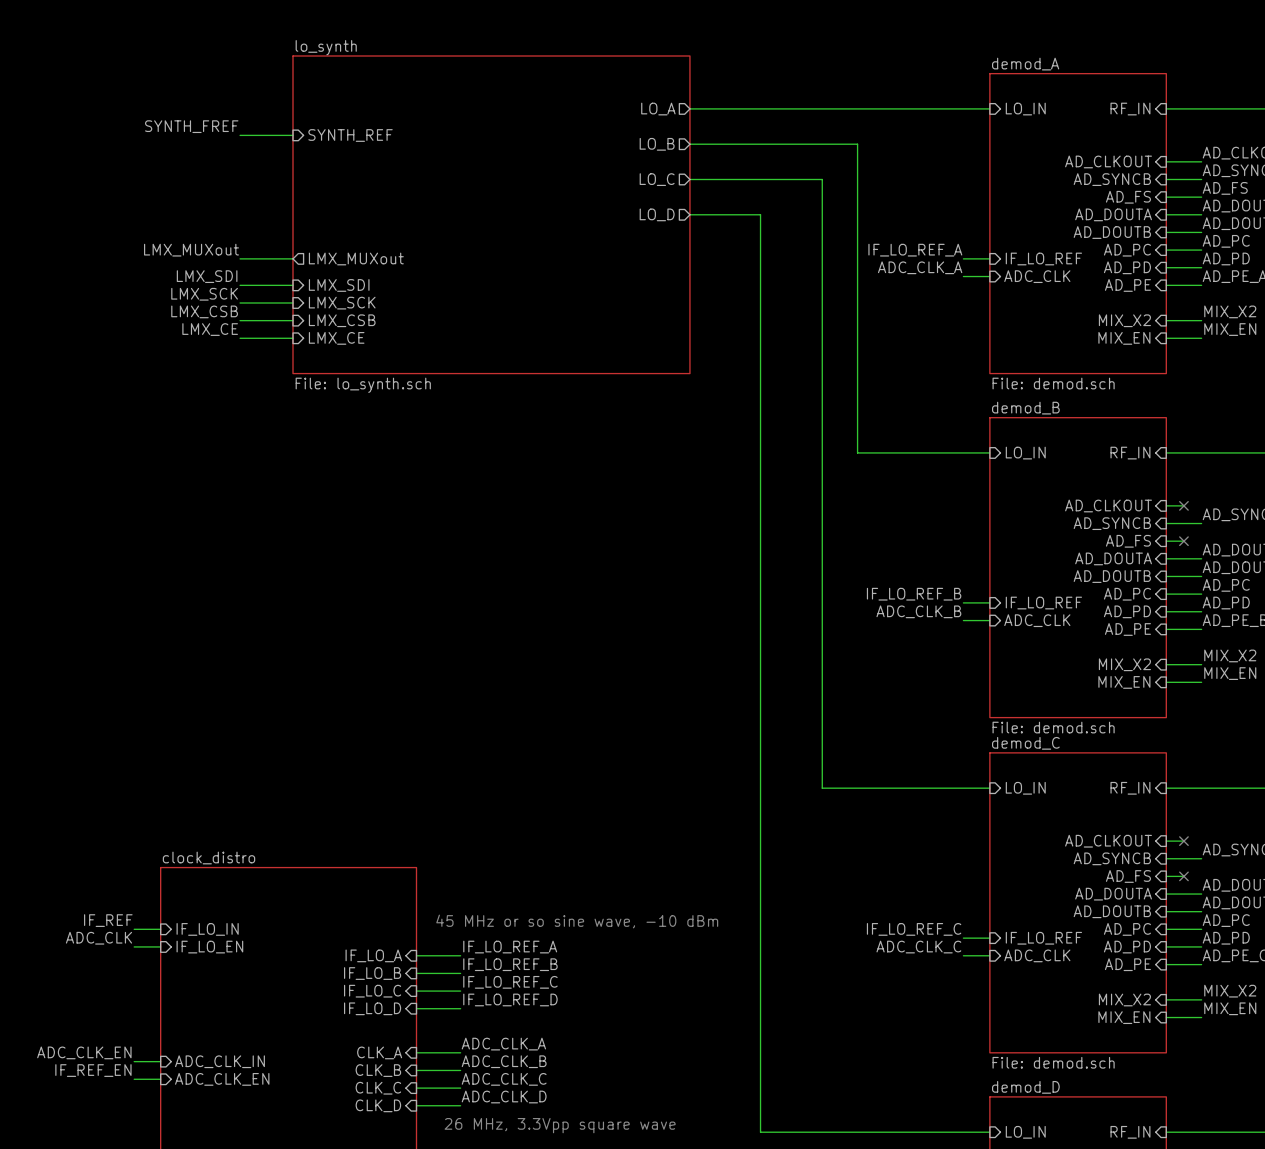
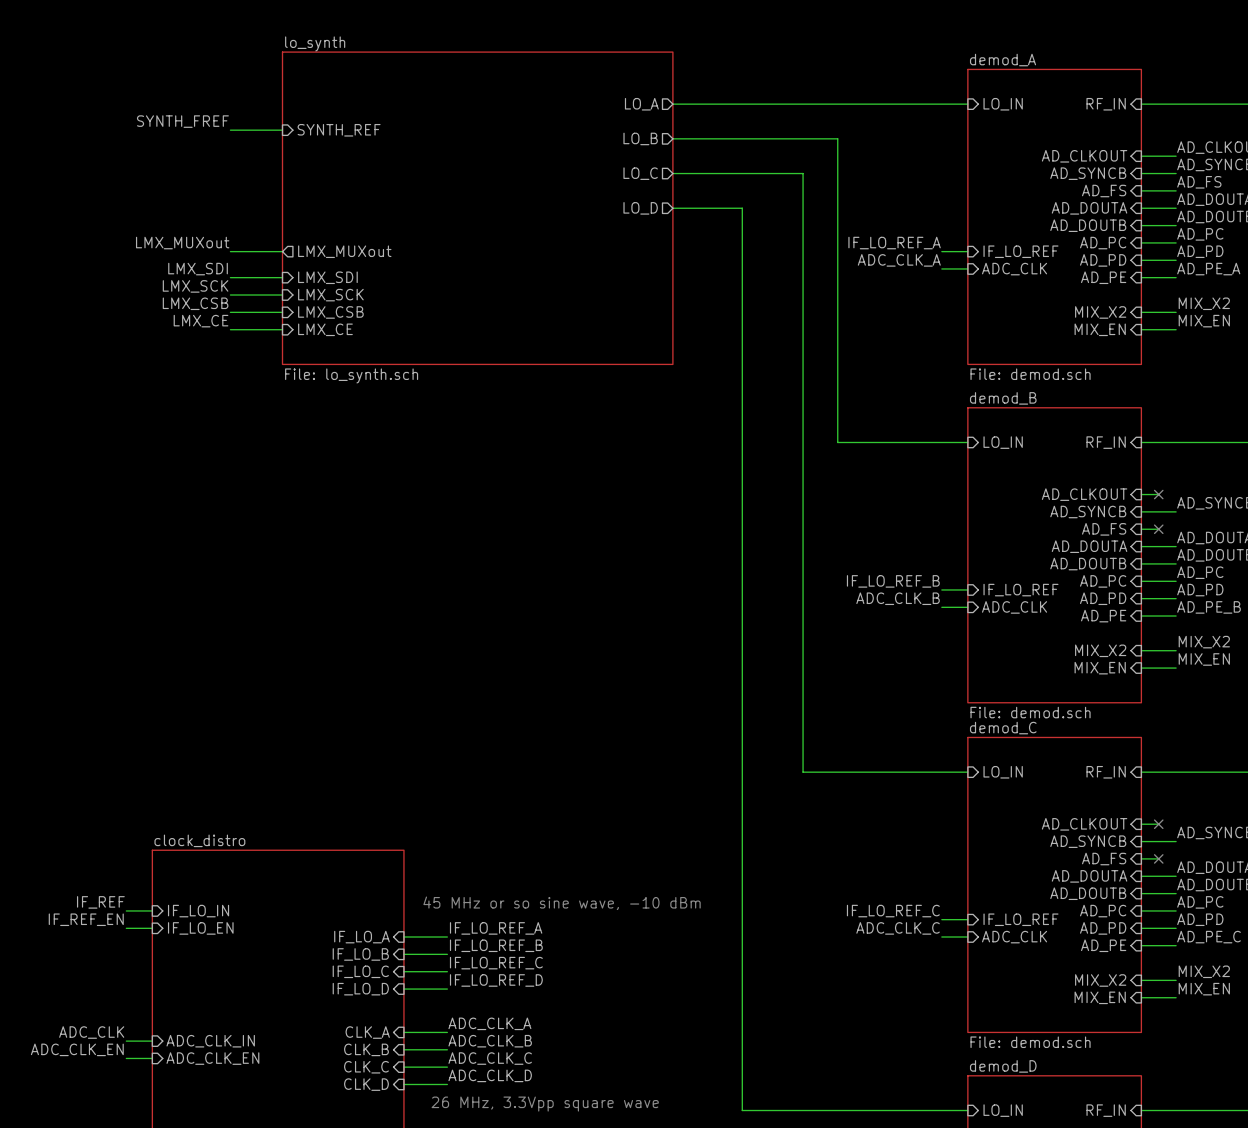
label: ADC_CLK (98, 938) -> IF_REF_EN (86, 919)
label: ADC_CLK_EN (84, 1052) -> ADC_CLK (91, 1032)
label: IF_REF_EN (93, 1070) -> ADC_CLK_EN (77, 1049)

